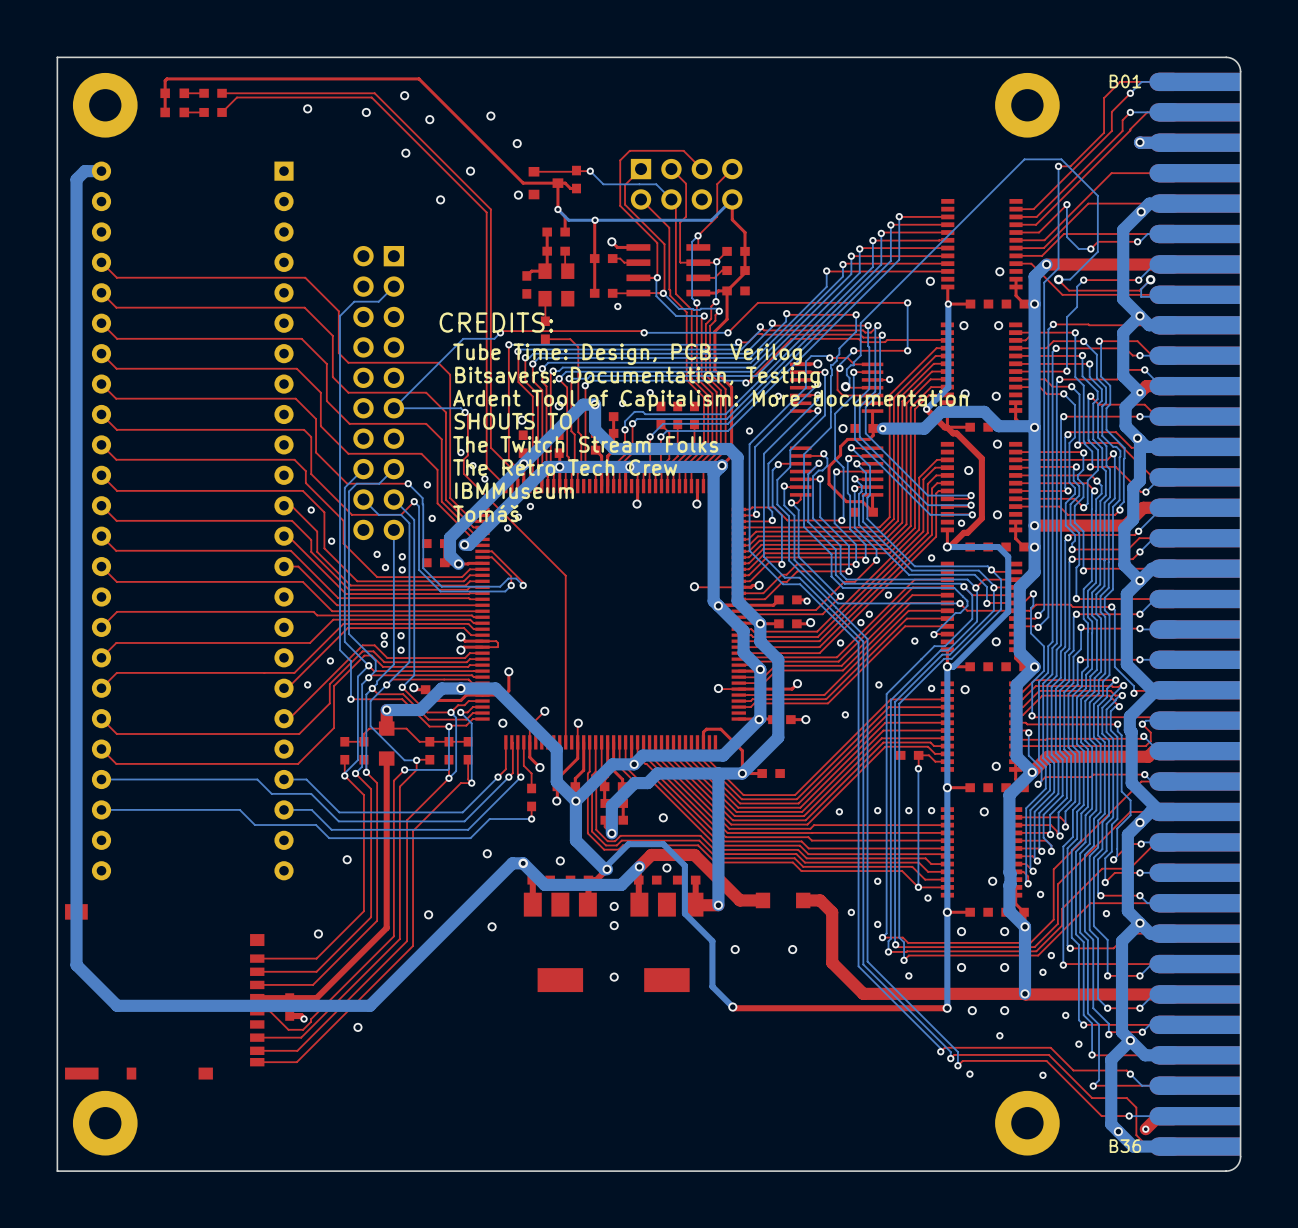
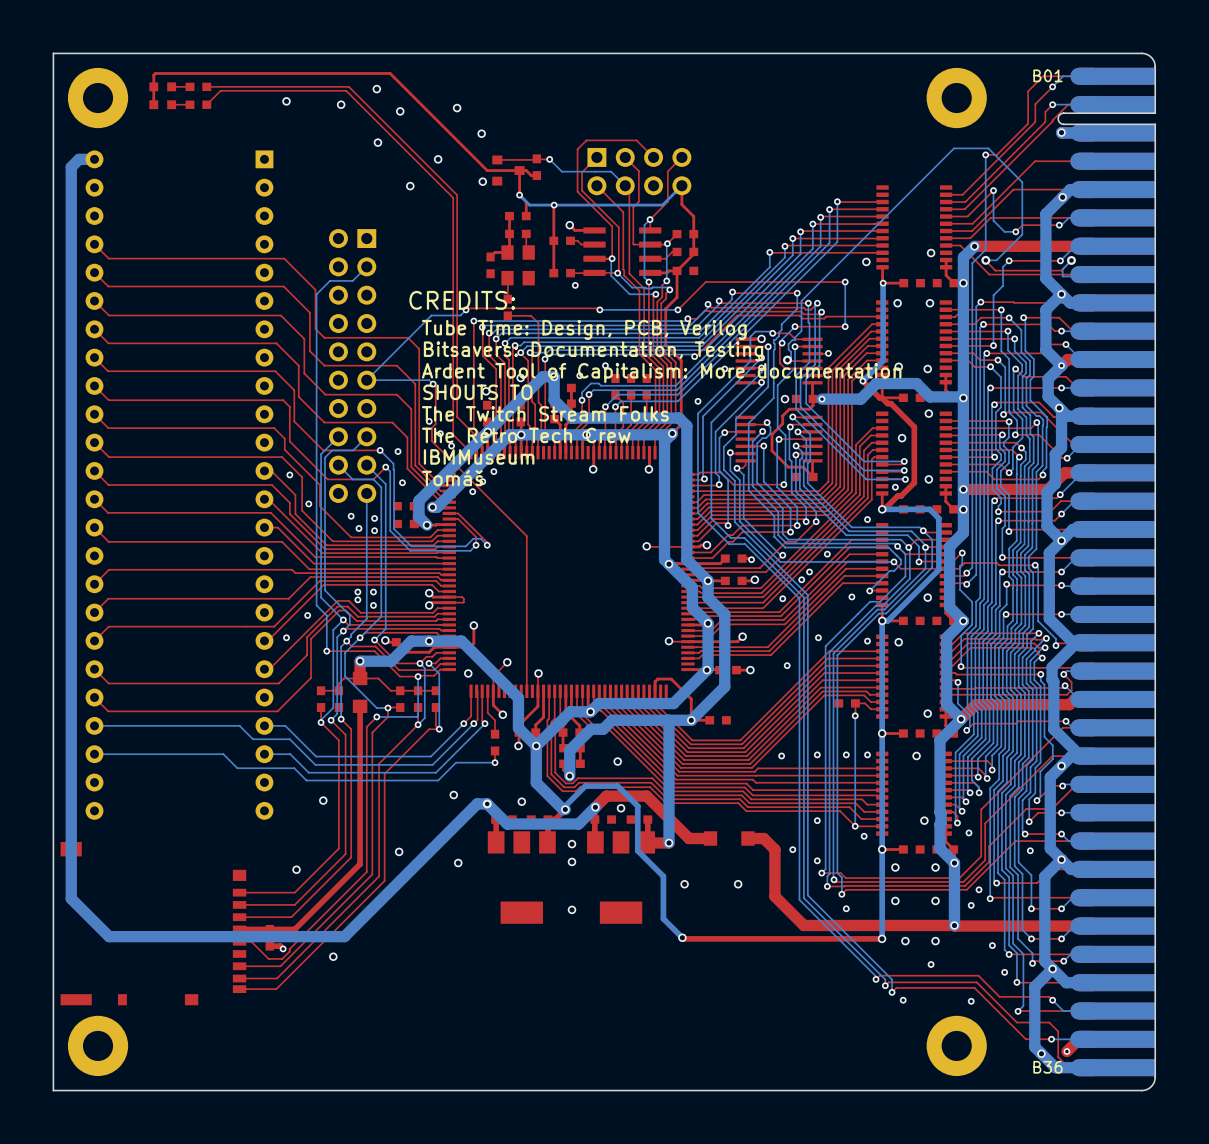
board edge: (1240, 121) (1240, 133) -> (1155, 113) (1063, 113) (1059, 115) (1058, 118) (1060, 122) (1063, 124) (1155, 124)

